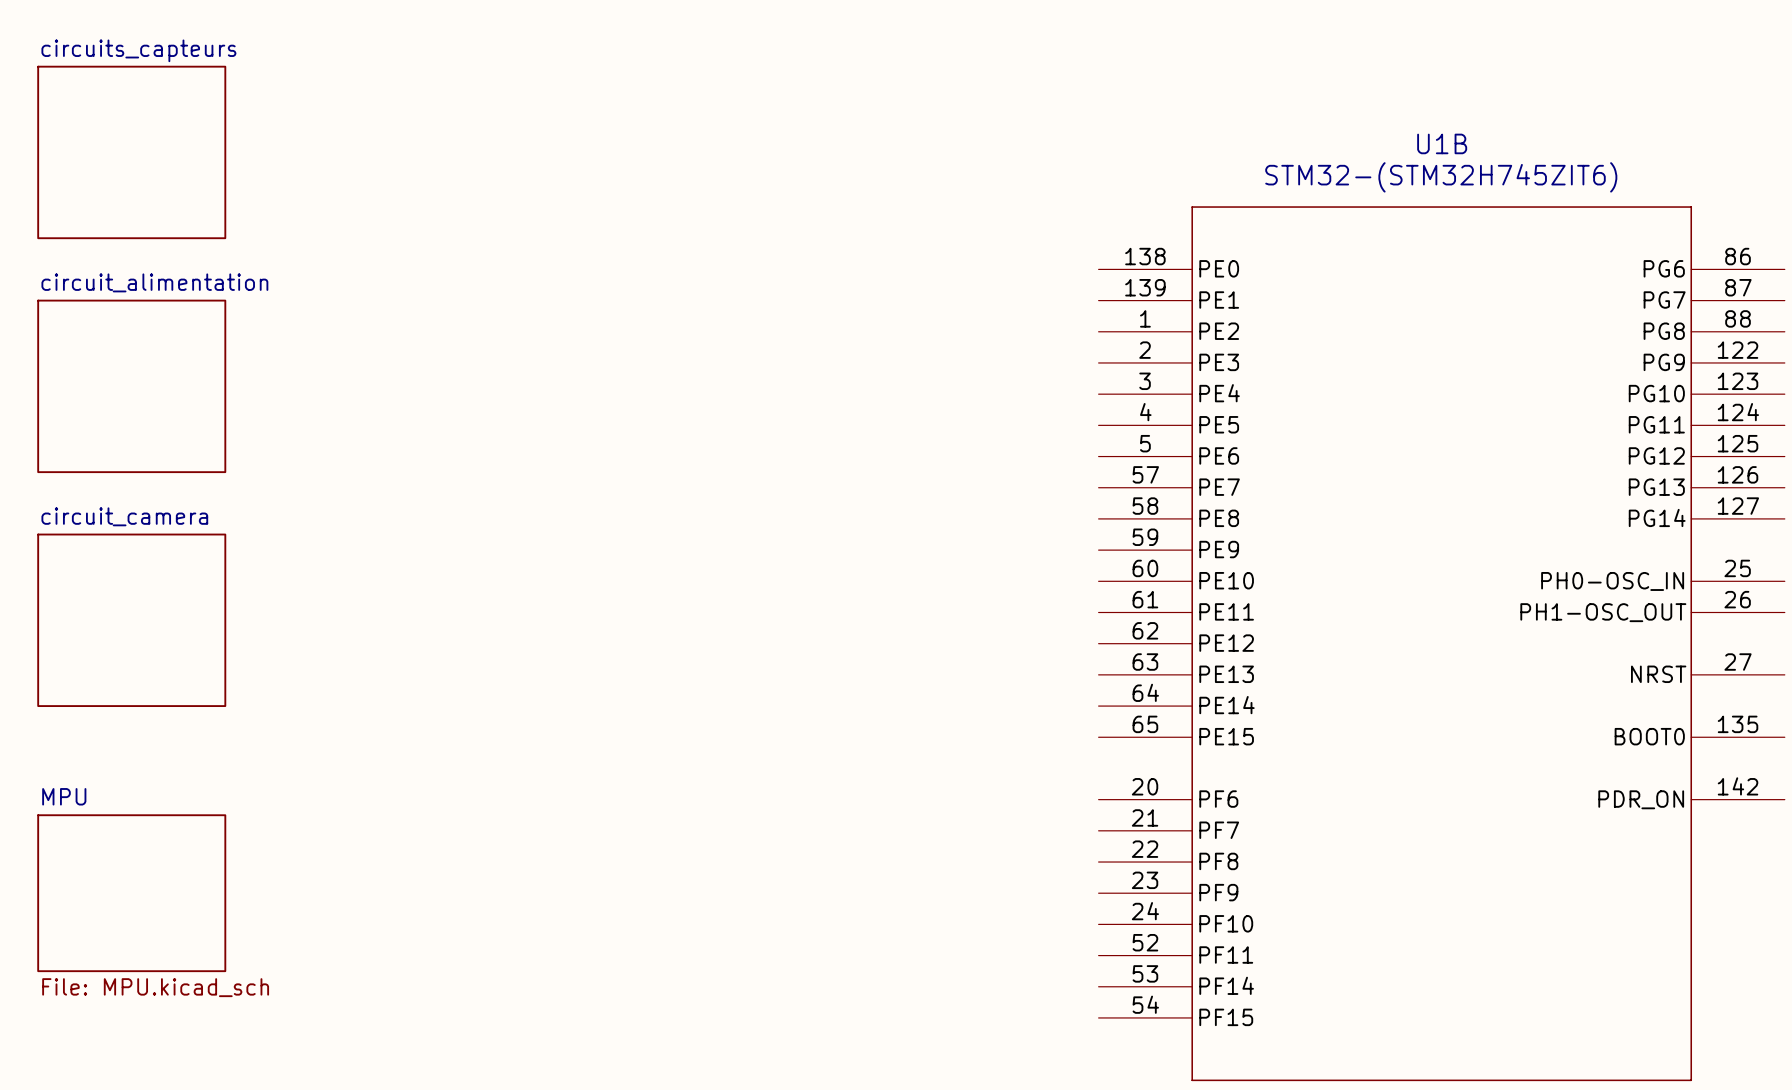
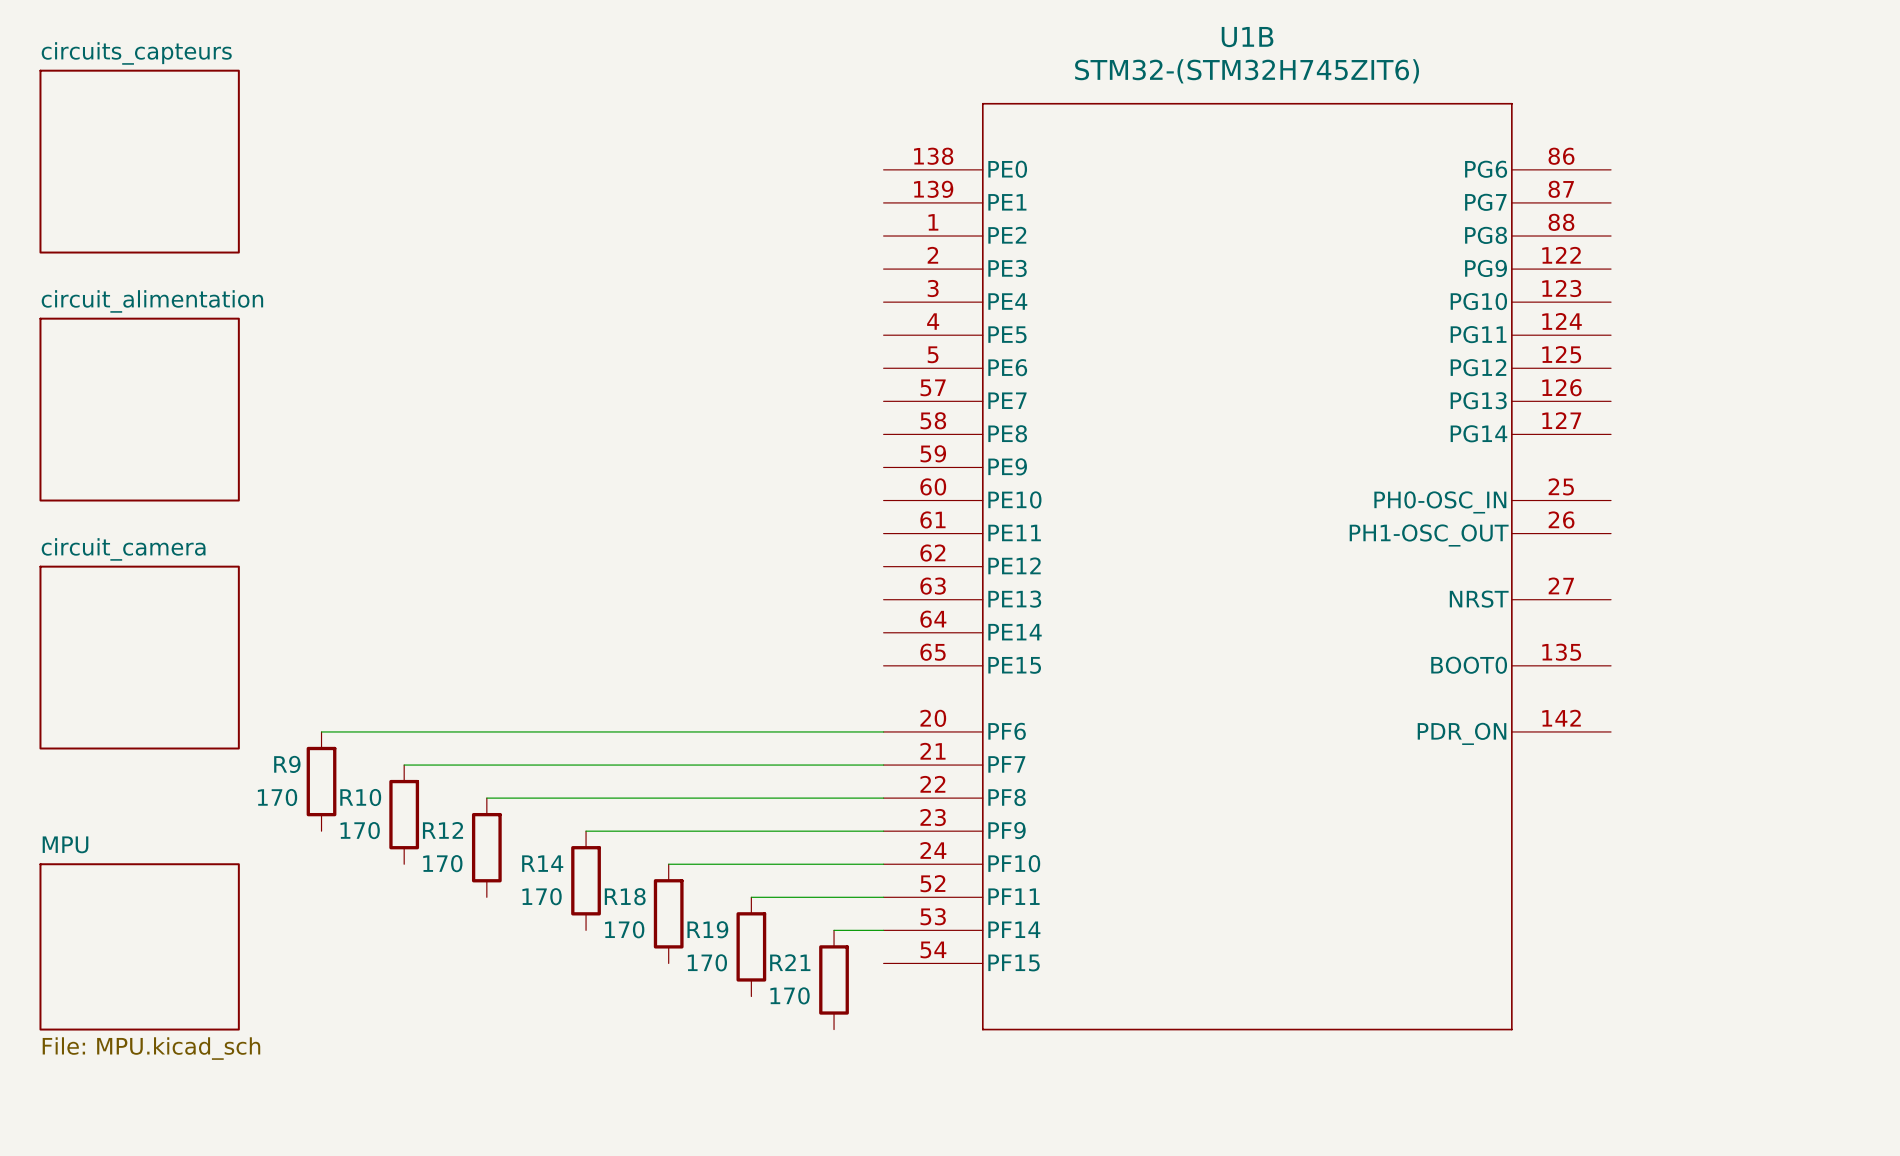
U1B position: (1441, 643) -> (1247, 566)
wire: none -> (321, 731) (883, 731)
wire: none -> (404, 765) (883, 765)
R9: none -> 170 (321, 781)
wire: none -> (486, 798) (883, 798)
R10: none -> 170 (404, 814)
wire: none -> (586, 831) (883, 831)
R12: none -> 170 (486, 847)
wire: none -> (668, 864) (883, 864)
R14: none -> 170 (586, 880)
wire: none -> (751, 897) (883, 897)
R18: none -> 170 (668, 913)
wire: none -> (834, 930) (883, 930)
R19: none -> 170 (751, 946)
R21: none -> 170 (834, 979)

